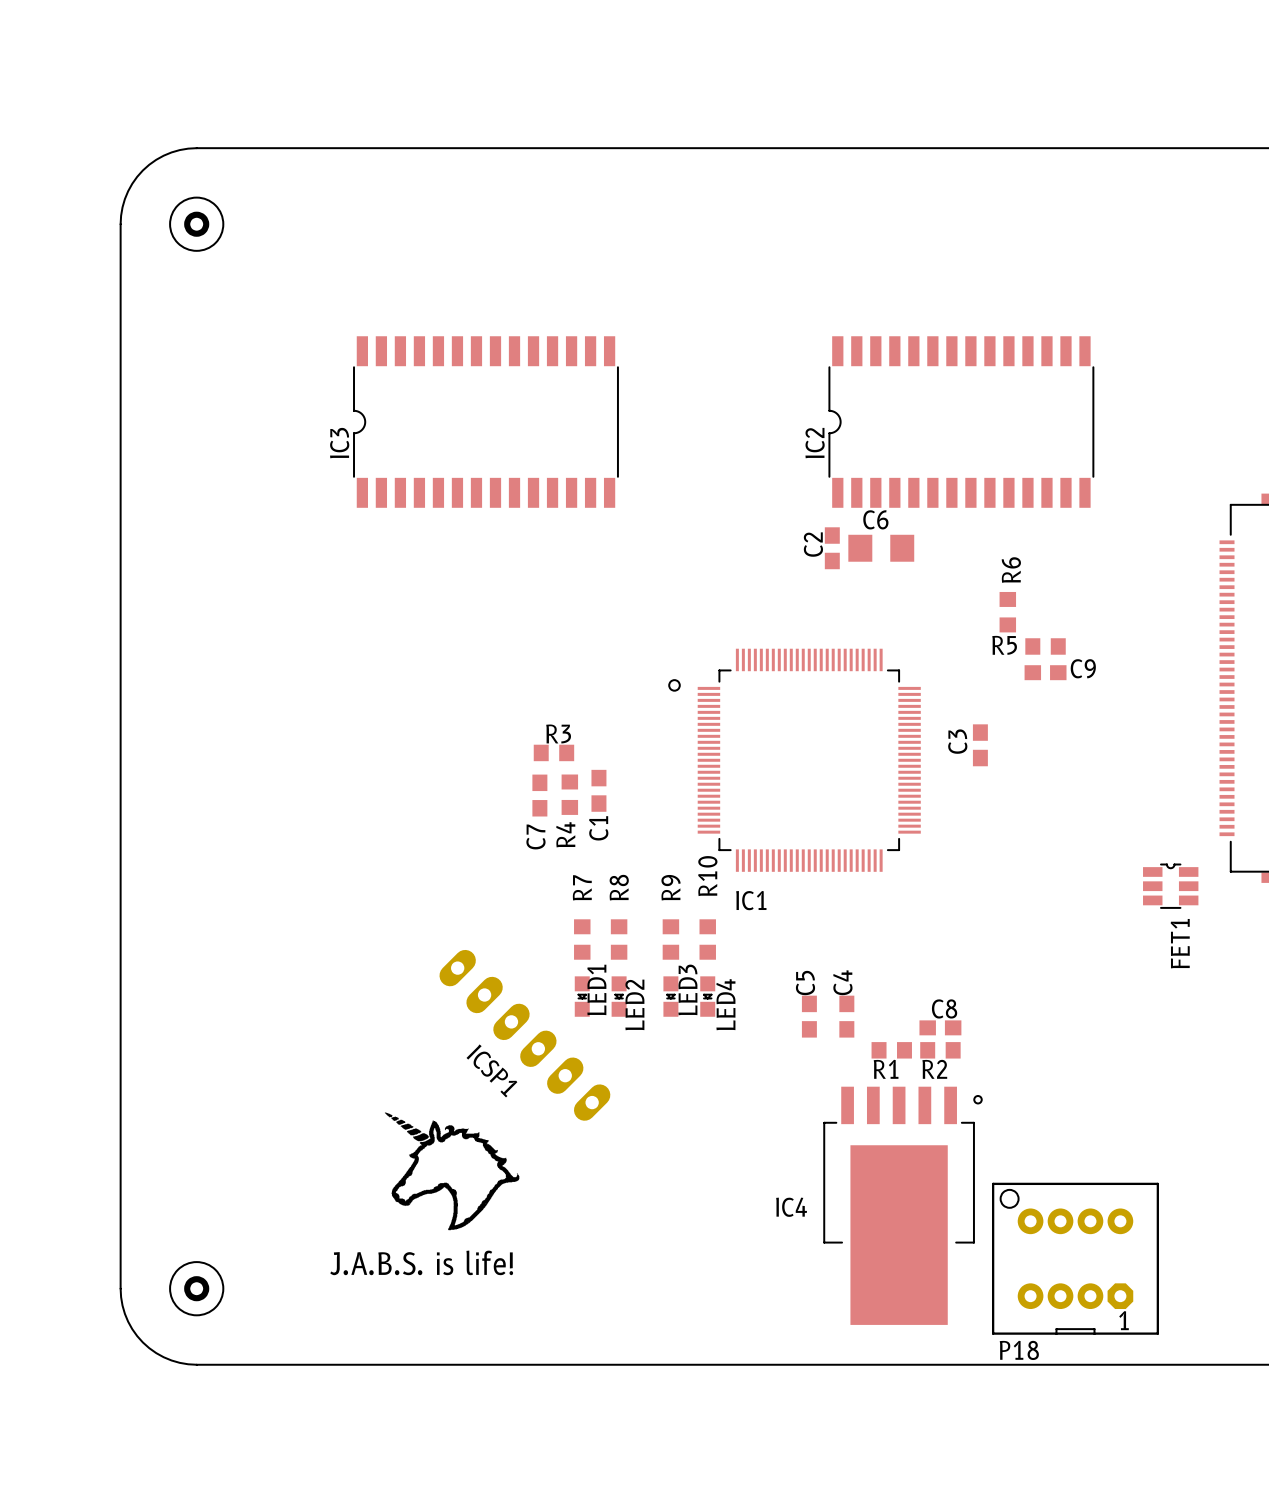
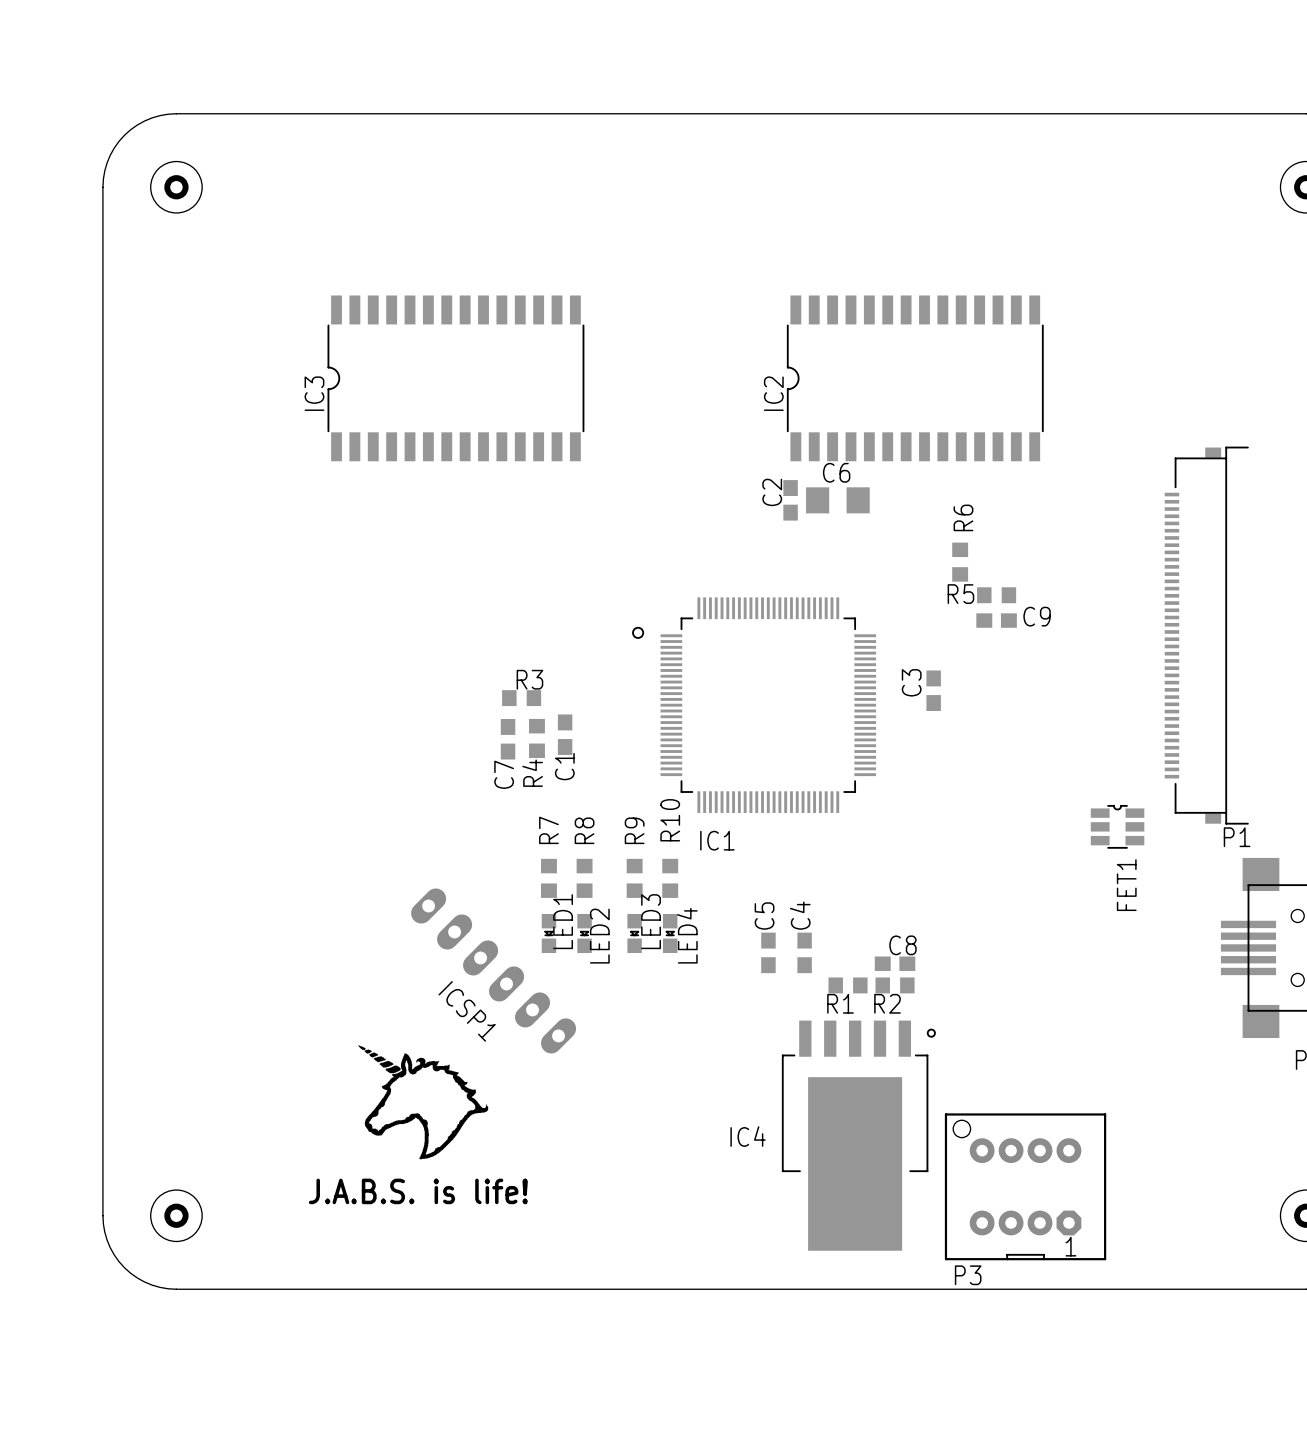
P18 name: P18 (1019, 1350) -> P3 (968, 1275)

